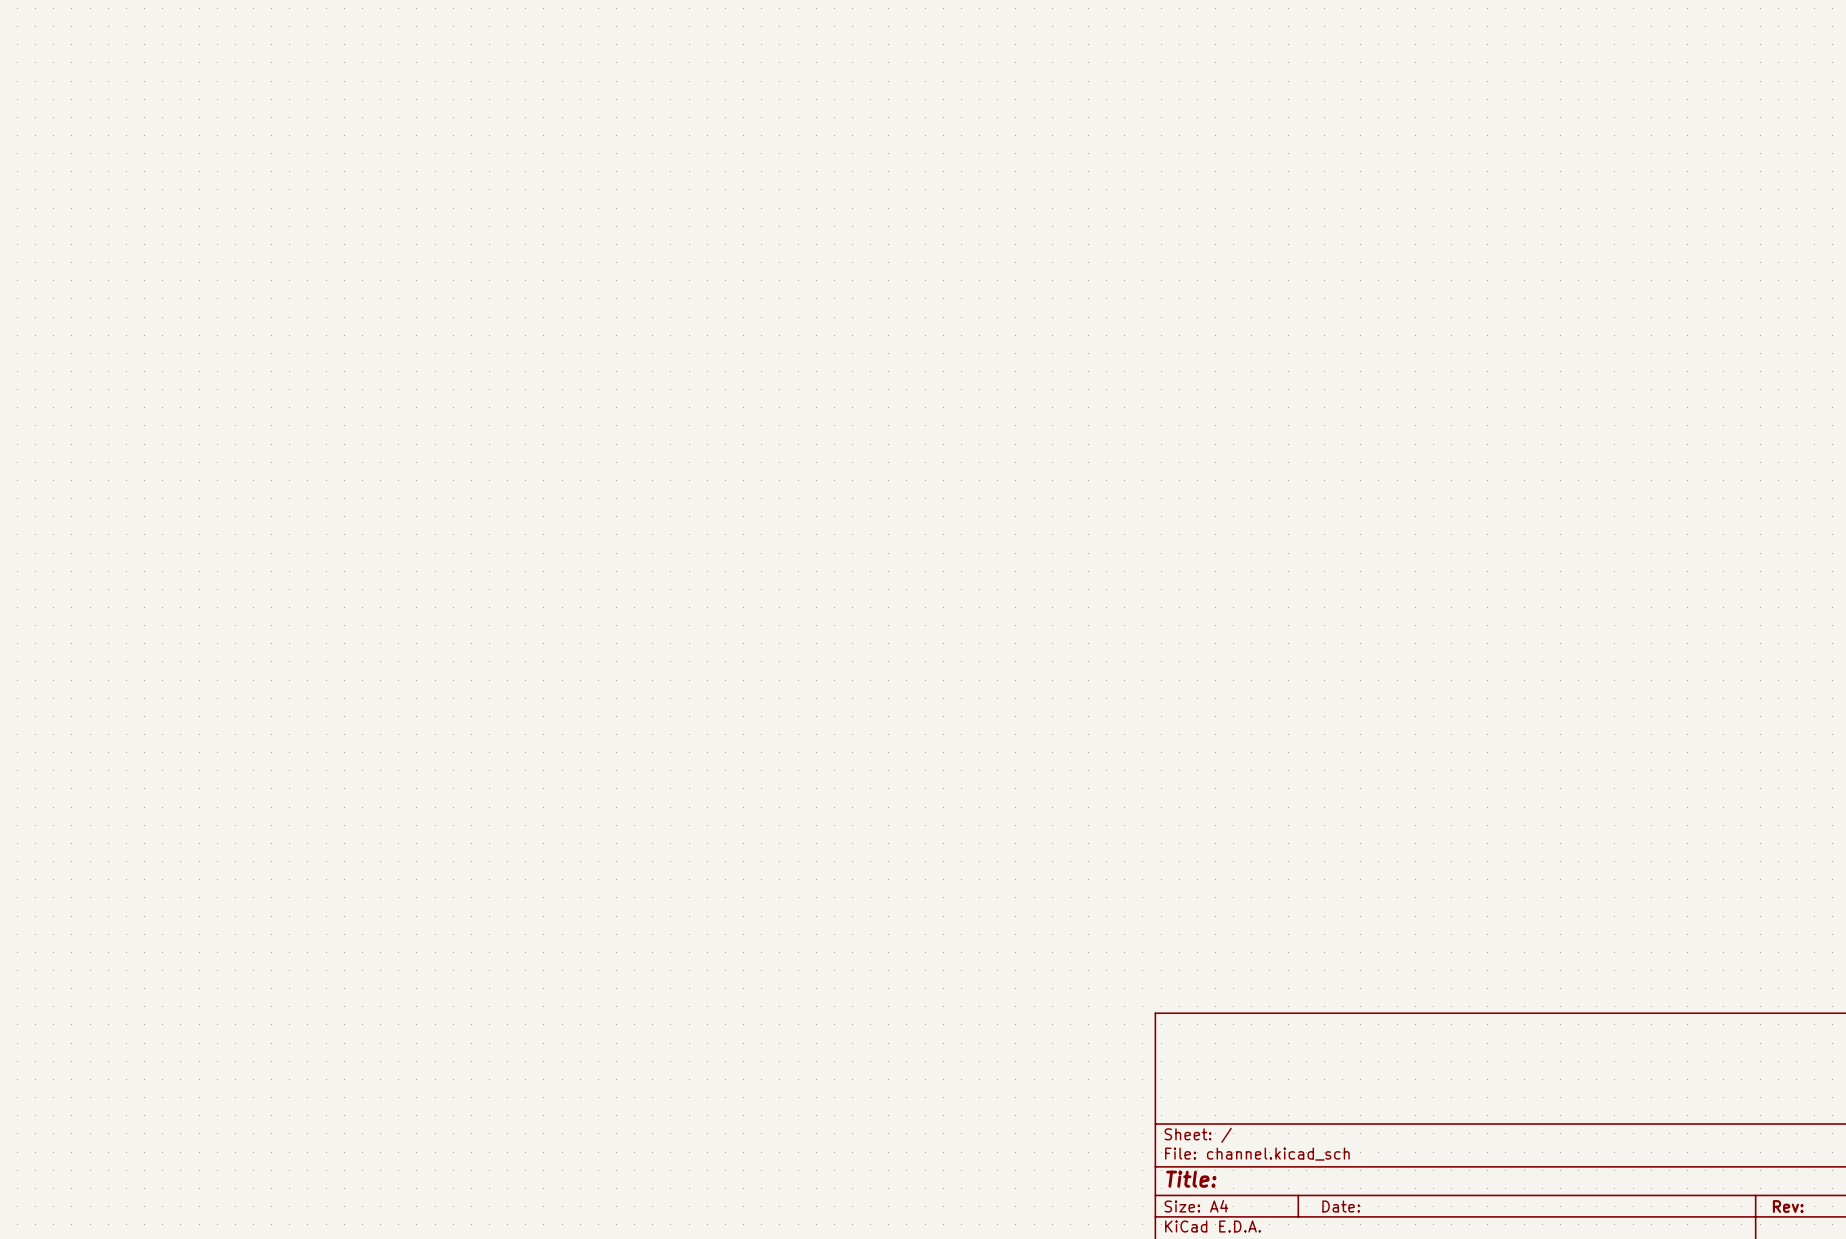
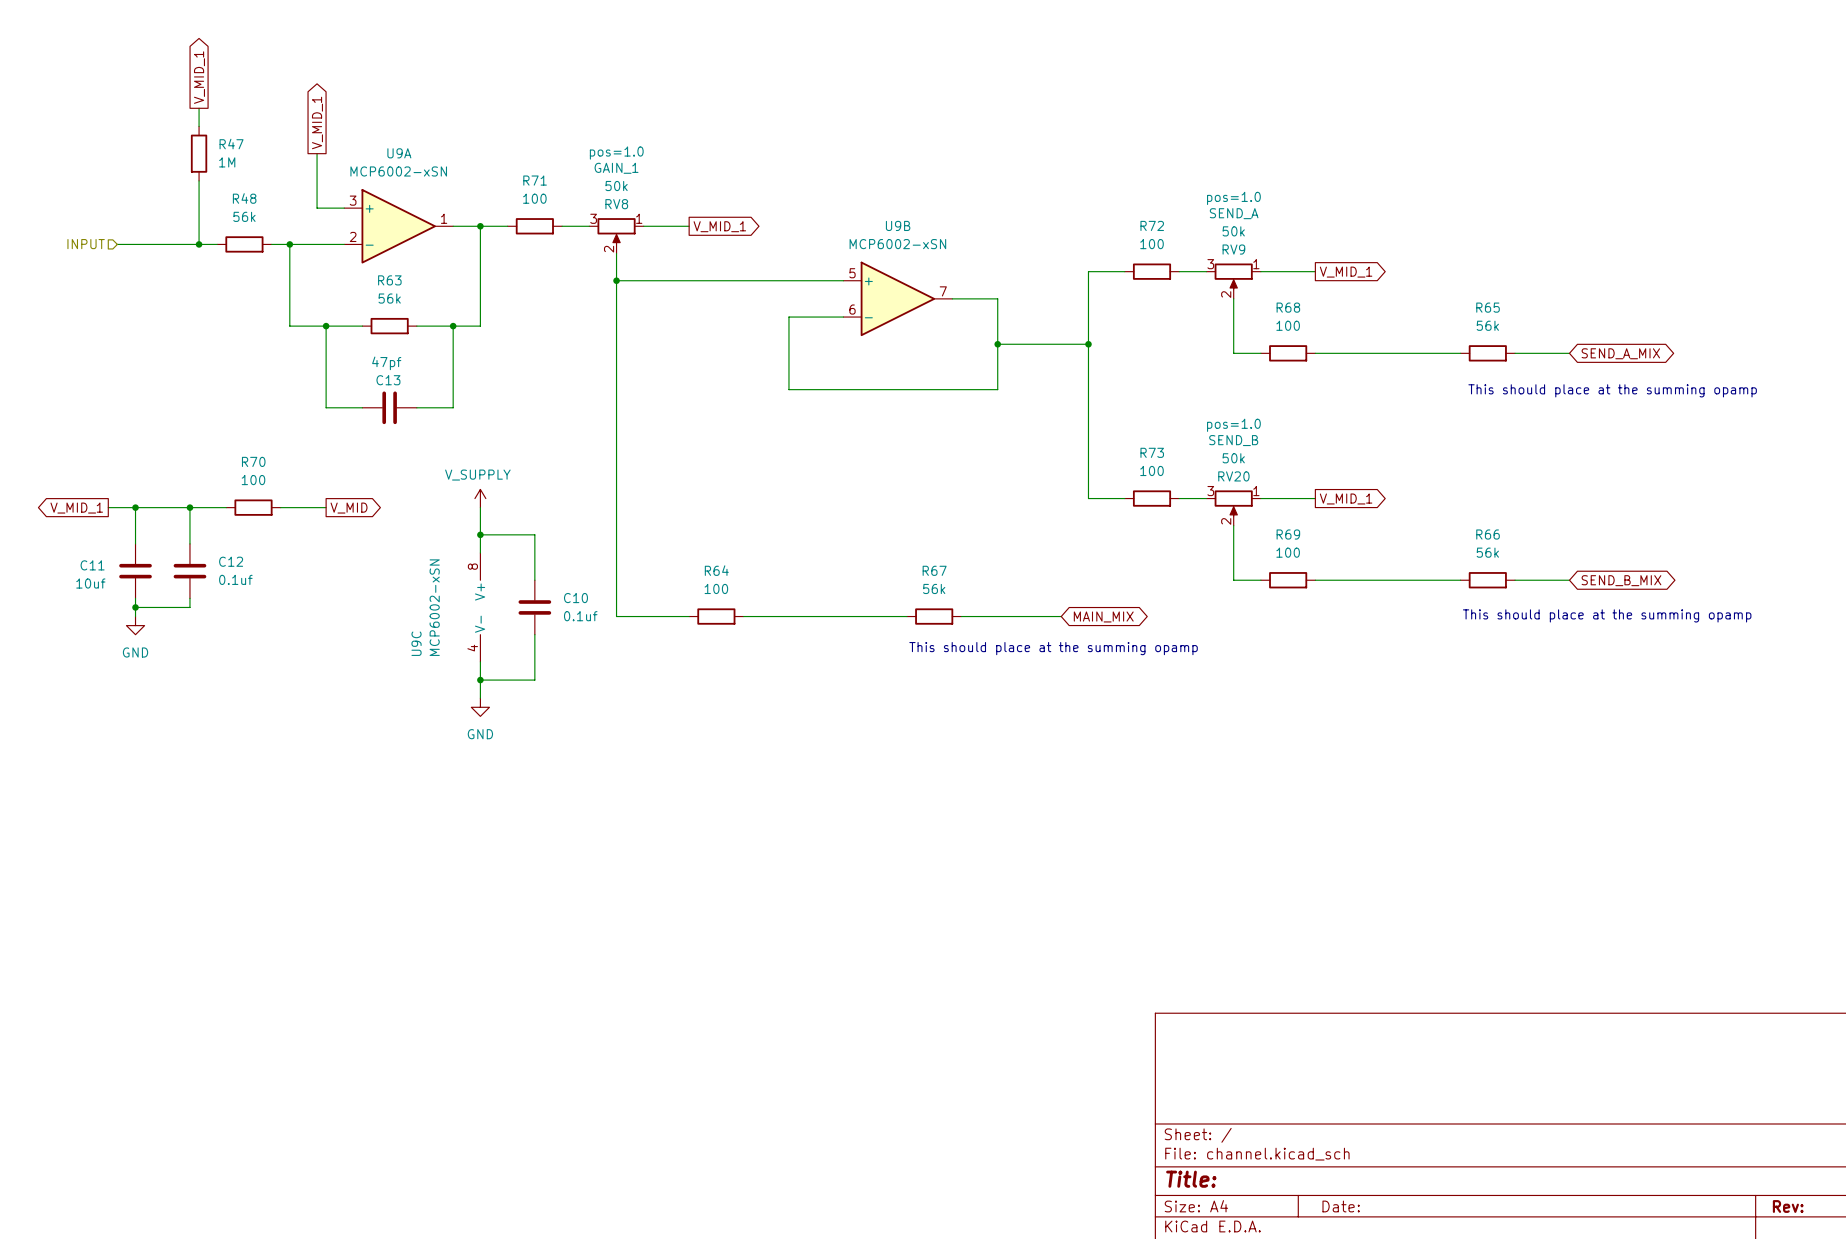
global label: none -> V_MID_1 (199, 77)
wire: none -> (199, 108) (199, 126)
global label: none -> V_MID_1 (317, 122)
R47: none -> 1M (199, 153)
wire: none -> (317, 153) (317, 208) (344, 208)
wire: none -> (199, 180) (199, 244)
U9A: none -> MCP6002-xSN (398, 226)
wire: none -> (453, 226) (507, 226)
wire: none -> (480, 226) (480, 326) (416, 326)
junction: none -> (480, 226)
R71: none -> 100 (534, 226)
wire: none -> (562, 226) (589, 226)
wire: none -> (643, 226) (689, 226)
global label: none -> V_MID_1 (719, 226)
RV8: none -> 50k (616, 235)
hierarchical label: none -> INPUT (86, 244)
wire: none -> (117, 244) (217, 244)
junction: none -> (199, 244)
R48: none -> 56k (244, 244)
wire: none -> (271, 244) (344, 244)
wire: none -> (289, 244) (289, 326) (362, 326)
junction: none -> (289, 244)
wire: none -> (616, 253) (616, 616) (689, 616)
wire: none -> (1124, 271) (1088, 271) (1088, 498) (1124, 498)
R72: none -> 100 (1152, 271)
wire: none -> (1179, 271) (1206, 271)
wire: none -> (1260, 271) (1315, 271)
global label: none -> V_MID_1 (1346, 272)
wire: none -> (616, 280) (843, 280)
junction: none -> (616, 280)
RV9: none -> 50k (1233, 281)
U9B: none -> MCP6002-xSN (897, 298)
wire: none -> (952, 298) (997, 298) (997, 389) (788, 389) (788, 317) (843, 317)
wire: none -> (1233, 298) (1233, 353) (1260, 353)
wire: none -> (326, 326) (326, 407) (362, 407)
junction: none -> (326, 326)
R63: none -> 56k (389, 326)
wire: none -> (453, 326) (453, 407) (416, 407)
junction: none -> (453, 326)
wire: none -> (997, 344) (1088, 344)
junction: none -> (997, 344)
junction: none -> (1088, 344)
R68: none -> 100 (1288, 353)
wire: none -> (1315, 353) (1460, 353)
R65: none -> 56k (1487, 353)
wire: none -> (1515, 353) (1569, 353)
global label: none -> SEND_A_MIX (1620, 353)
text: none -> This should place at the summing opamp (1612, 390)
C13: none -> 47pf (389, 407)
power symbol: none -> V_SUPPLY (480, 498)
R73: none -> 100 (1152, 498)
wire: none -> (1179, 498) (1206, 498)
wire: none -> (1260, 498) (1315, 498)
global label: none -> V_MID_1 (1346, 498)
wire: none -> (108, 507) (226, 507)
wire: none -> (135, 507) (135, 543)
junction: none -> (135, 507)
wire: none -> (189, 507) (189, 543)
junction: none -> (189, 507)
R70: none -> 100 (253, 507)
wire: none -> (280, 507) (326, 507)
wire: none -> (480, 507) (480, 553)
global label: none -> V_MID_1 (76, 508)
global label: none -> V_MID (349, 508)
RV20: none -> 50k (1233, 508)
wire: none -> (1233, 525) (1233, 580) (1260, 580)
wire: none -> (480, 534) (534, 534) (534, 580)
junction: none -> (480, 534)
C11: none -> 10uf (135, 571)
C12: none -> 0.1uf (189, 571)
R69: none -> 100 (1288, 580)
wire: none -> (1315, 580) (1460, 580)
R66: none -> 56k (1487, 580)
wire: none -> (1515, 580) (1569, 580)
global label: none -> SEND_B_MIX (1621, 580)
wire: none -> (135, 598) (135, 616)
wire: none -> (189, 598) (189, 607) (135, 607)
junction: none -> (135, 607)
U9C: none -> MCP6002-xSN (480, 607)
C10: none -> 0.1uf (534, 607)
text: none -> This should place at the summing opamp (1607, 615)
R64: none -> 100 (716, 616)
wire: none -> (743, 616) (906, 616)
R67: none -> 56k (934, 616)
wire: none -> (961, 616) (1061, 616)
global label: none -> MAIN_MIX (1103, 616)
power symbol: none -> GND (135, 625)
wire: none -> (534, 634) (534, 680) (480, 680)
text: none -> This should place at the summing opamp (1053, 648)
wire: none -> (480, 661) (480, 698)
junction: none -> (480, 680)
power symbol: none -> GND (480, 707)

